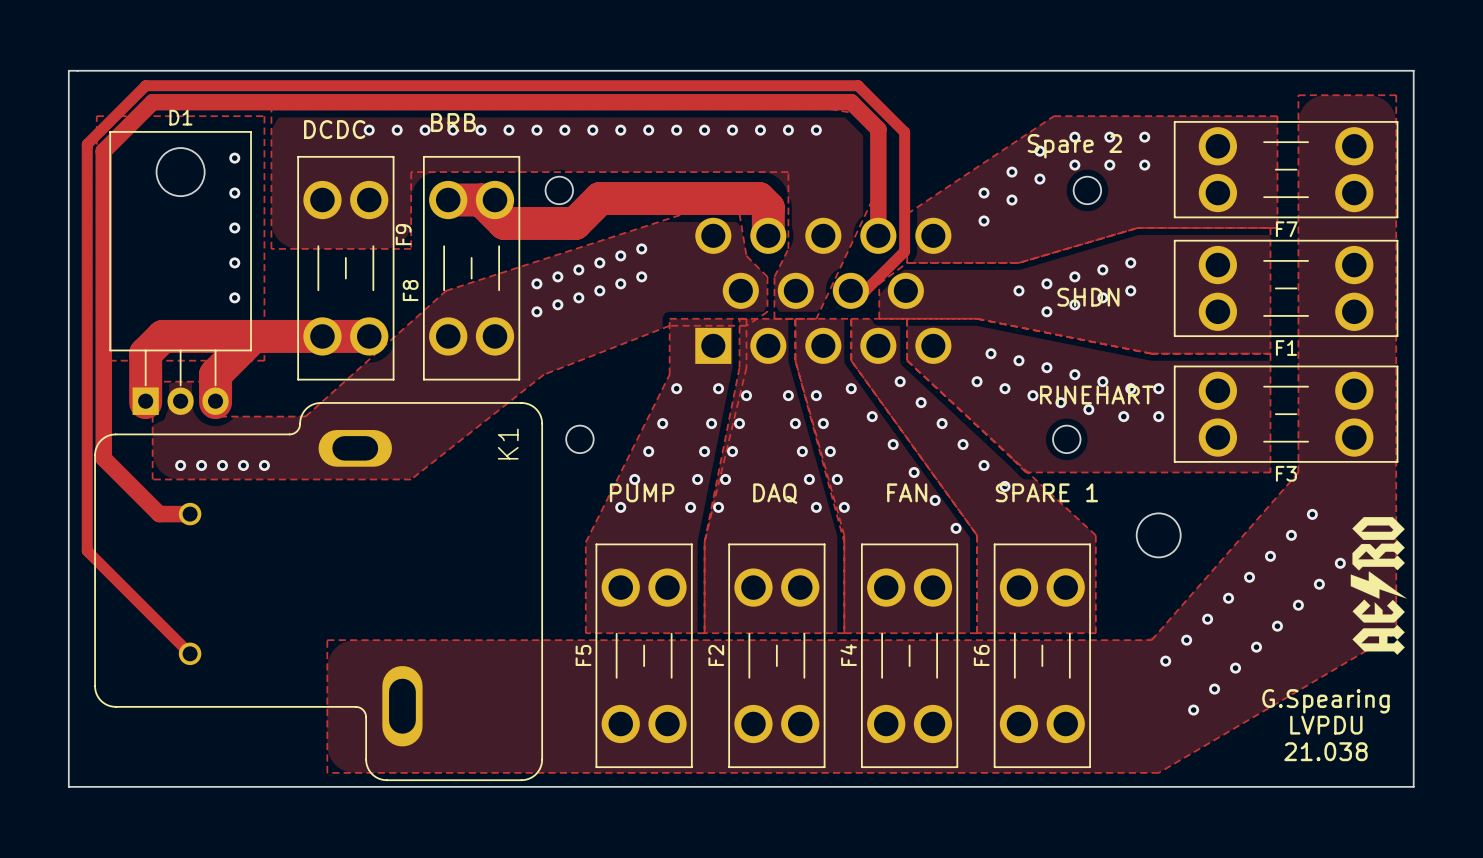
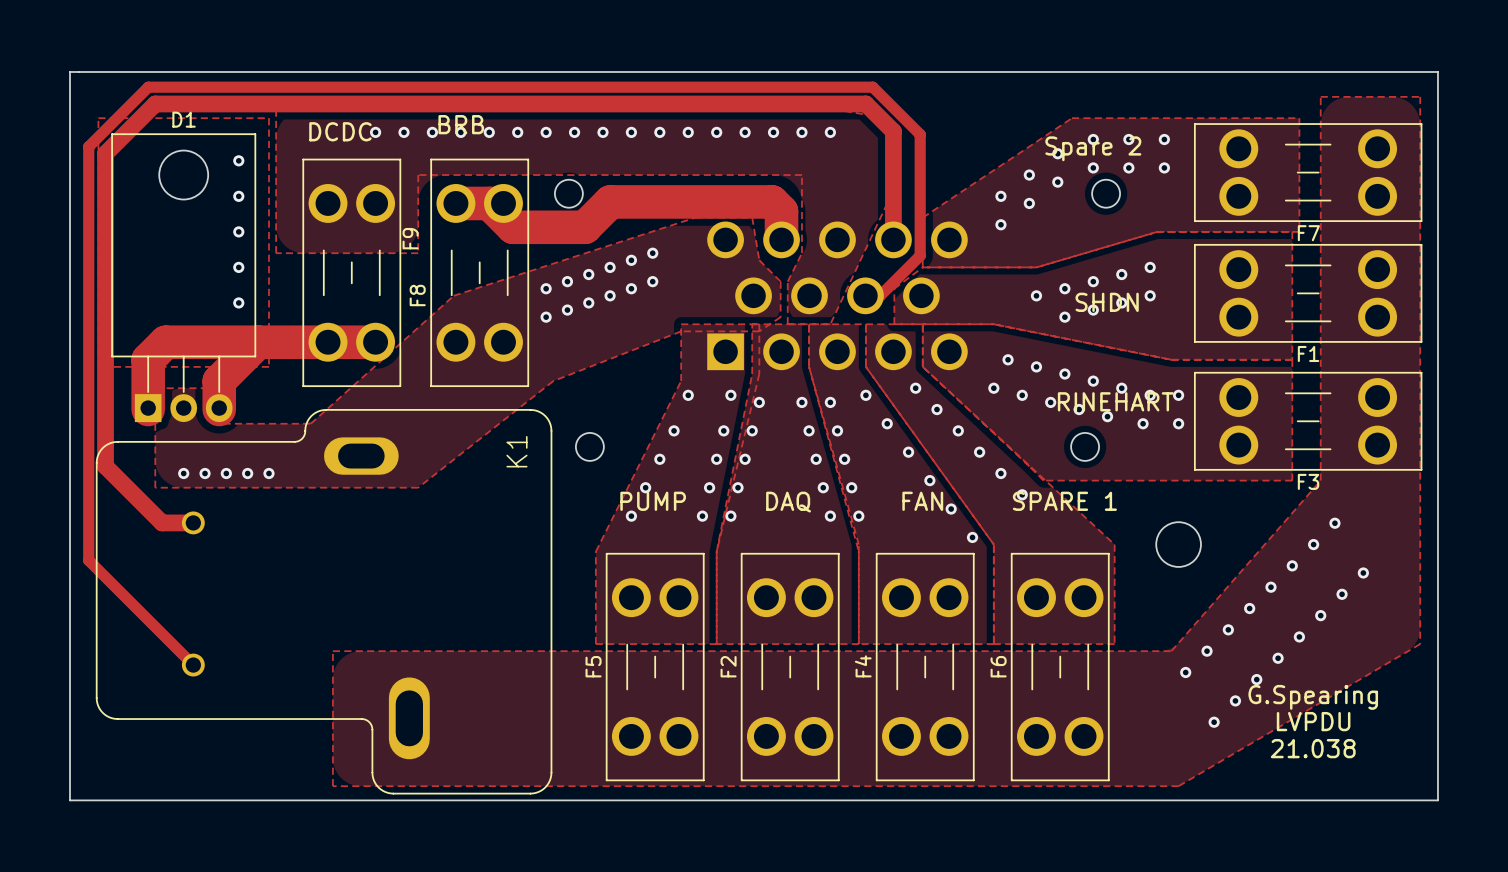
drawing: [1350, 517, 1407, 655] -> none
text position: G.Spearing (1325, 701) -> G.Spearing (1313, 697)
text position: LVPDU (1326, 725) -> LVPDU (1313, 721)
text position: 21.038 (1325, 751) -> 21.038 (1313, 748)

